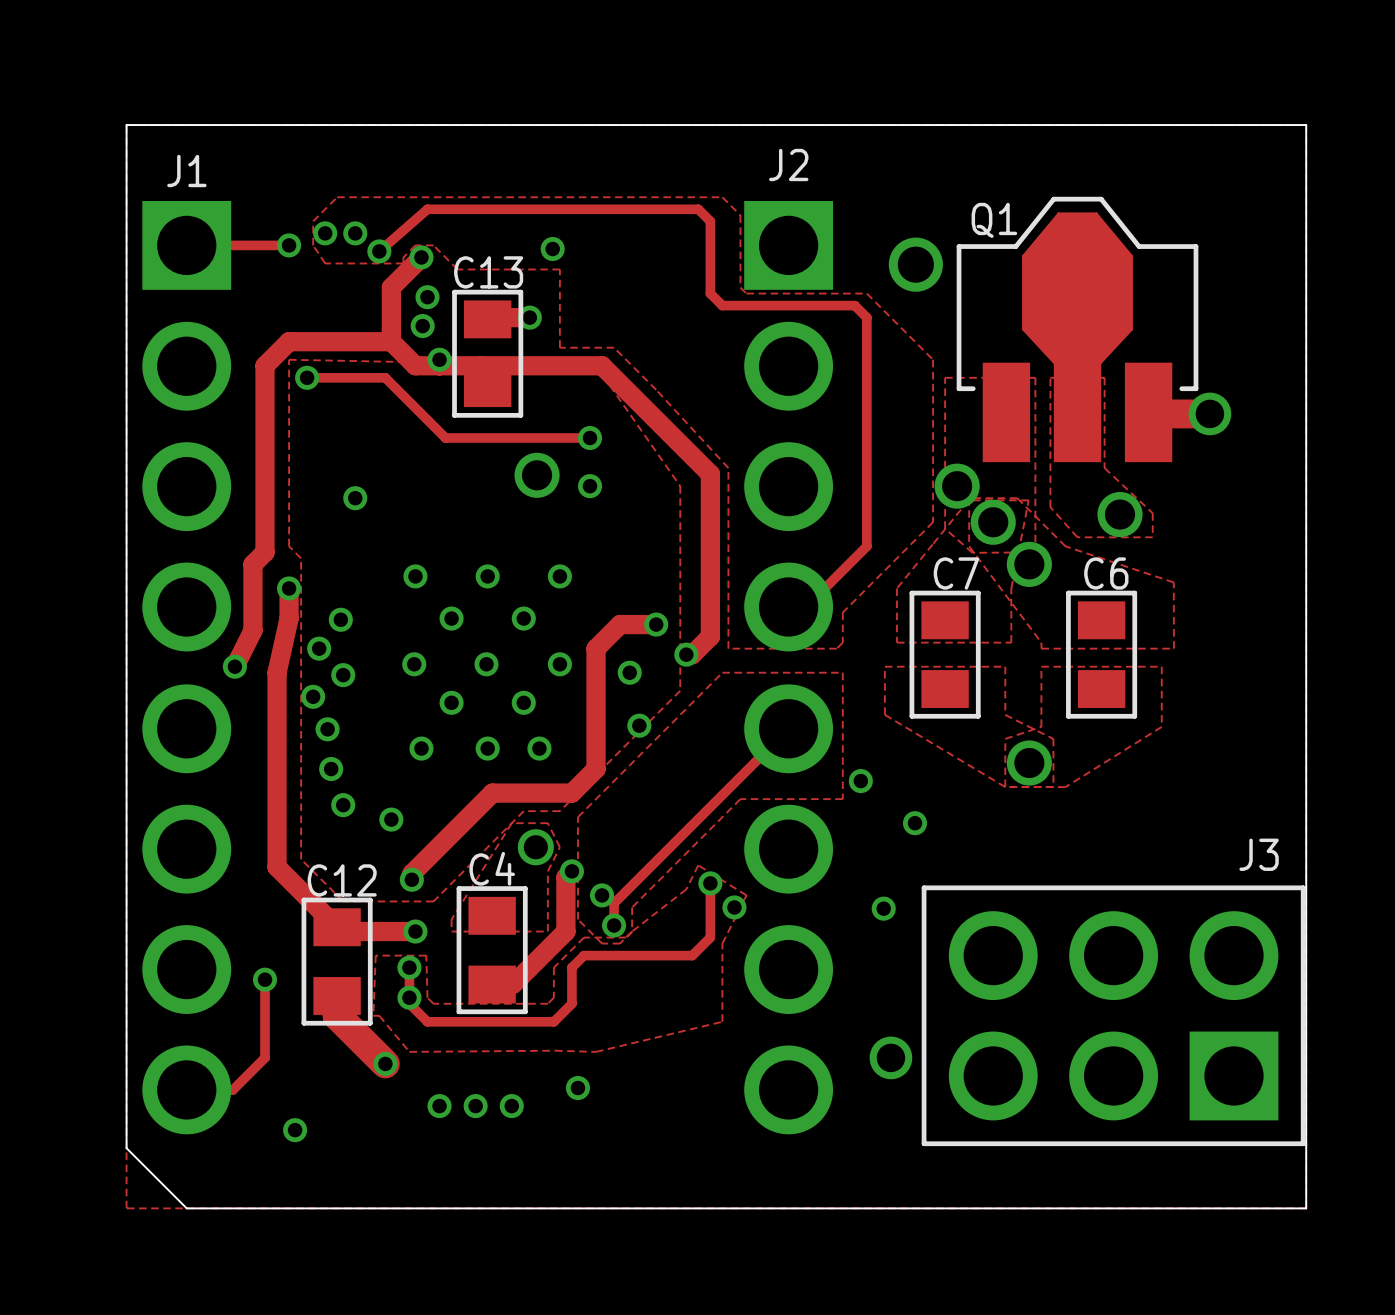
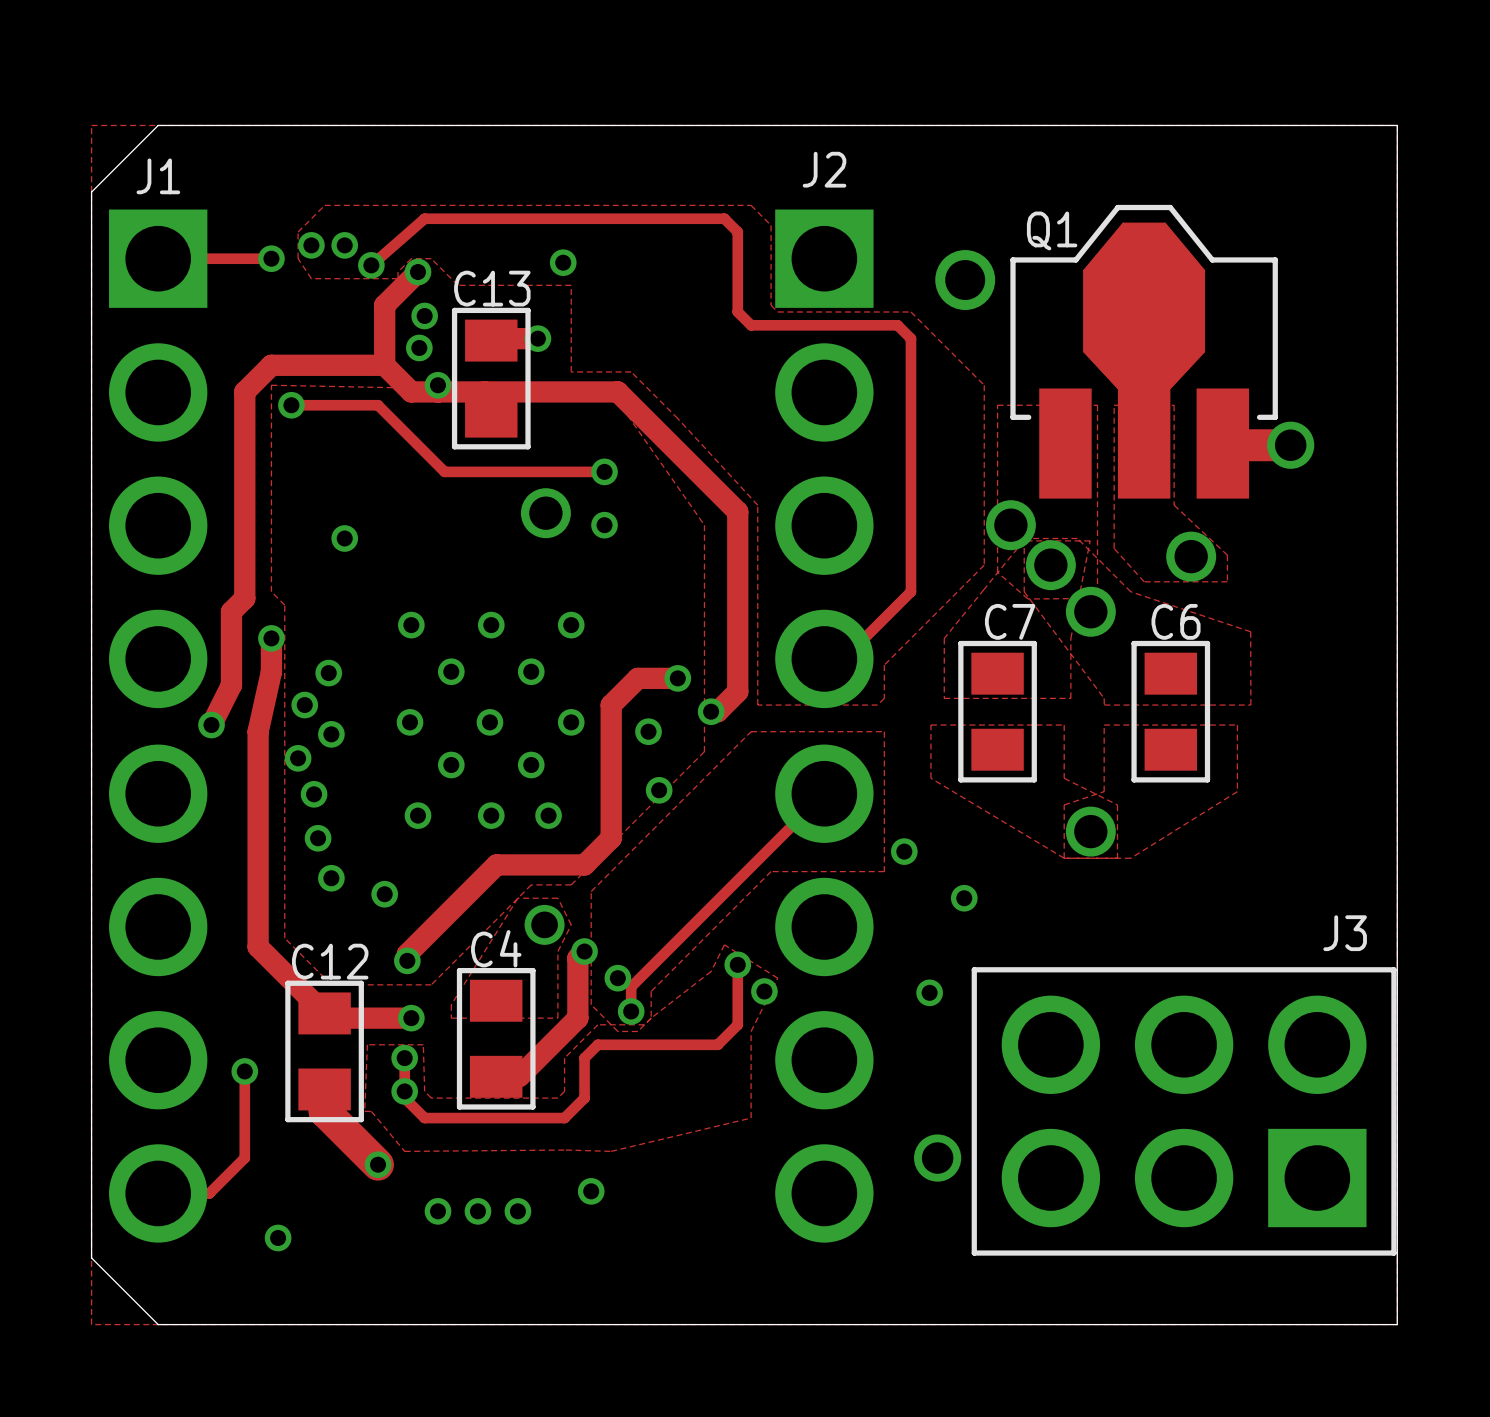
board edge: (186, 125) (126, 125) (126, 185) -> (158, 125) (91, 192)

